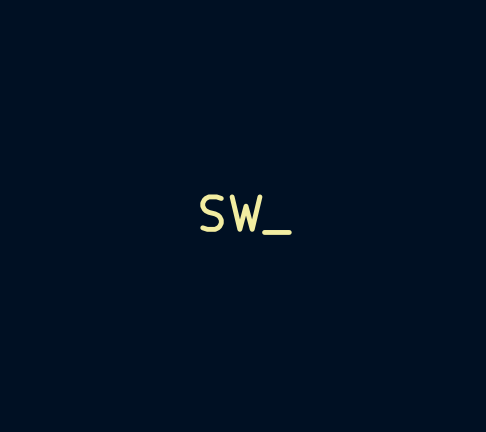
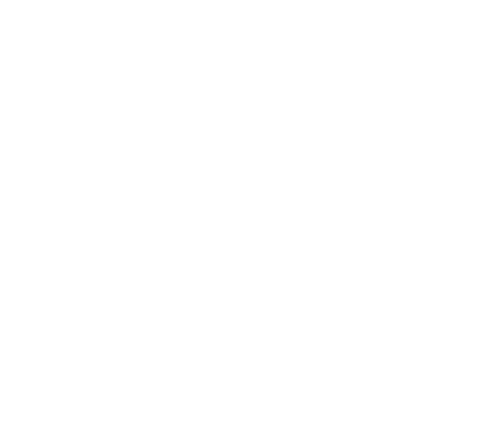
SW_: (246, 214) -> none

